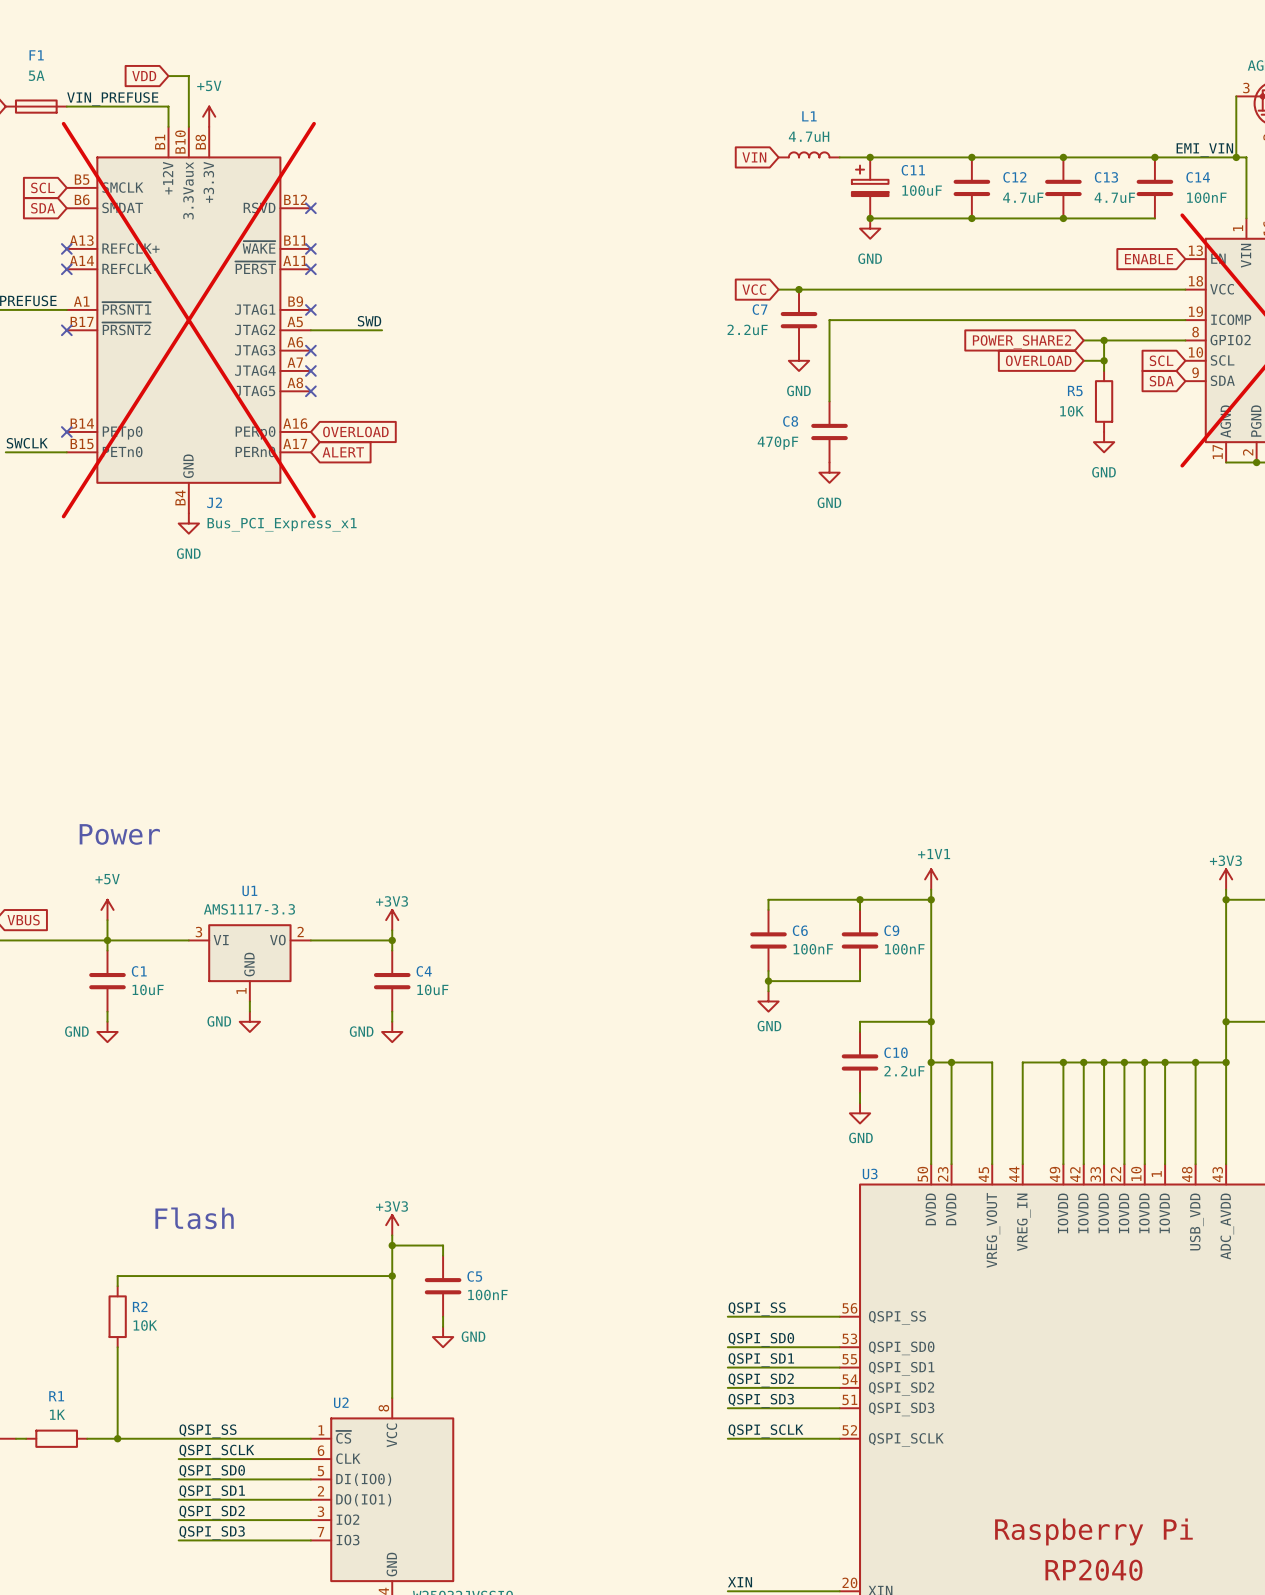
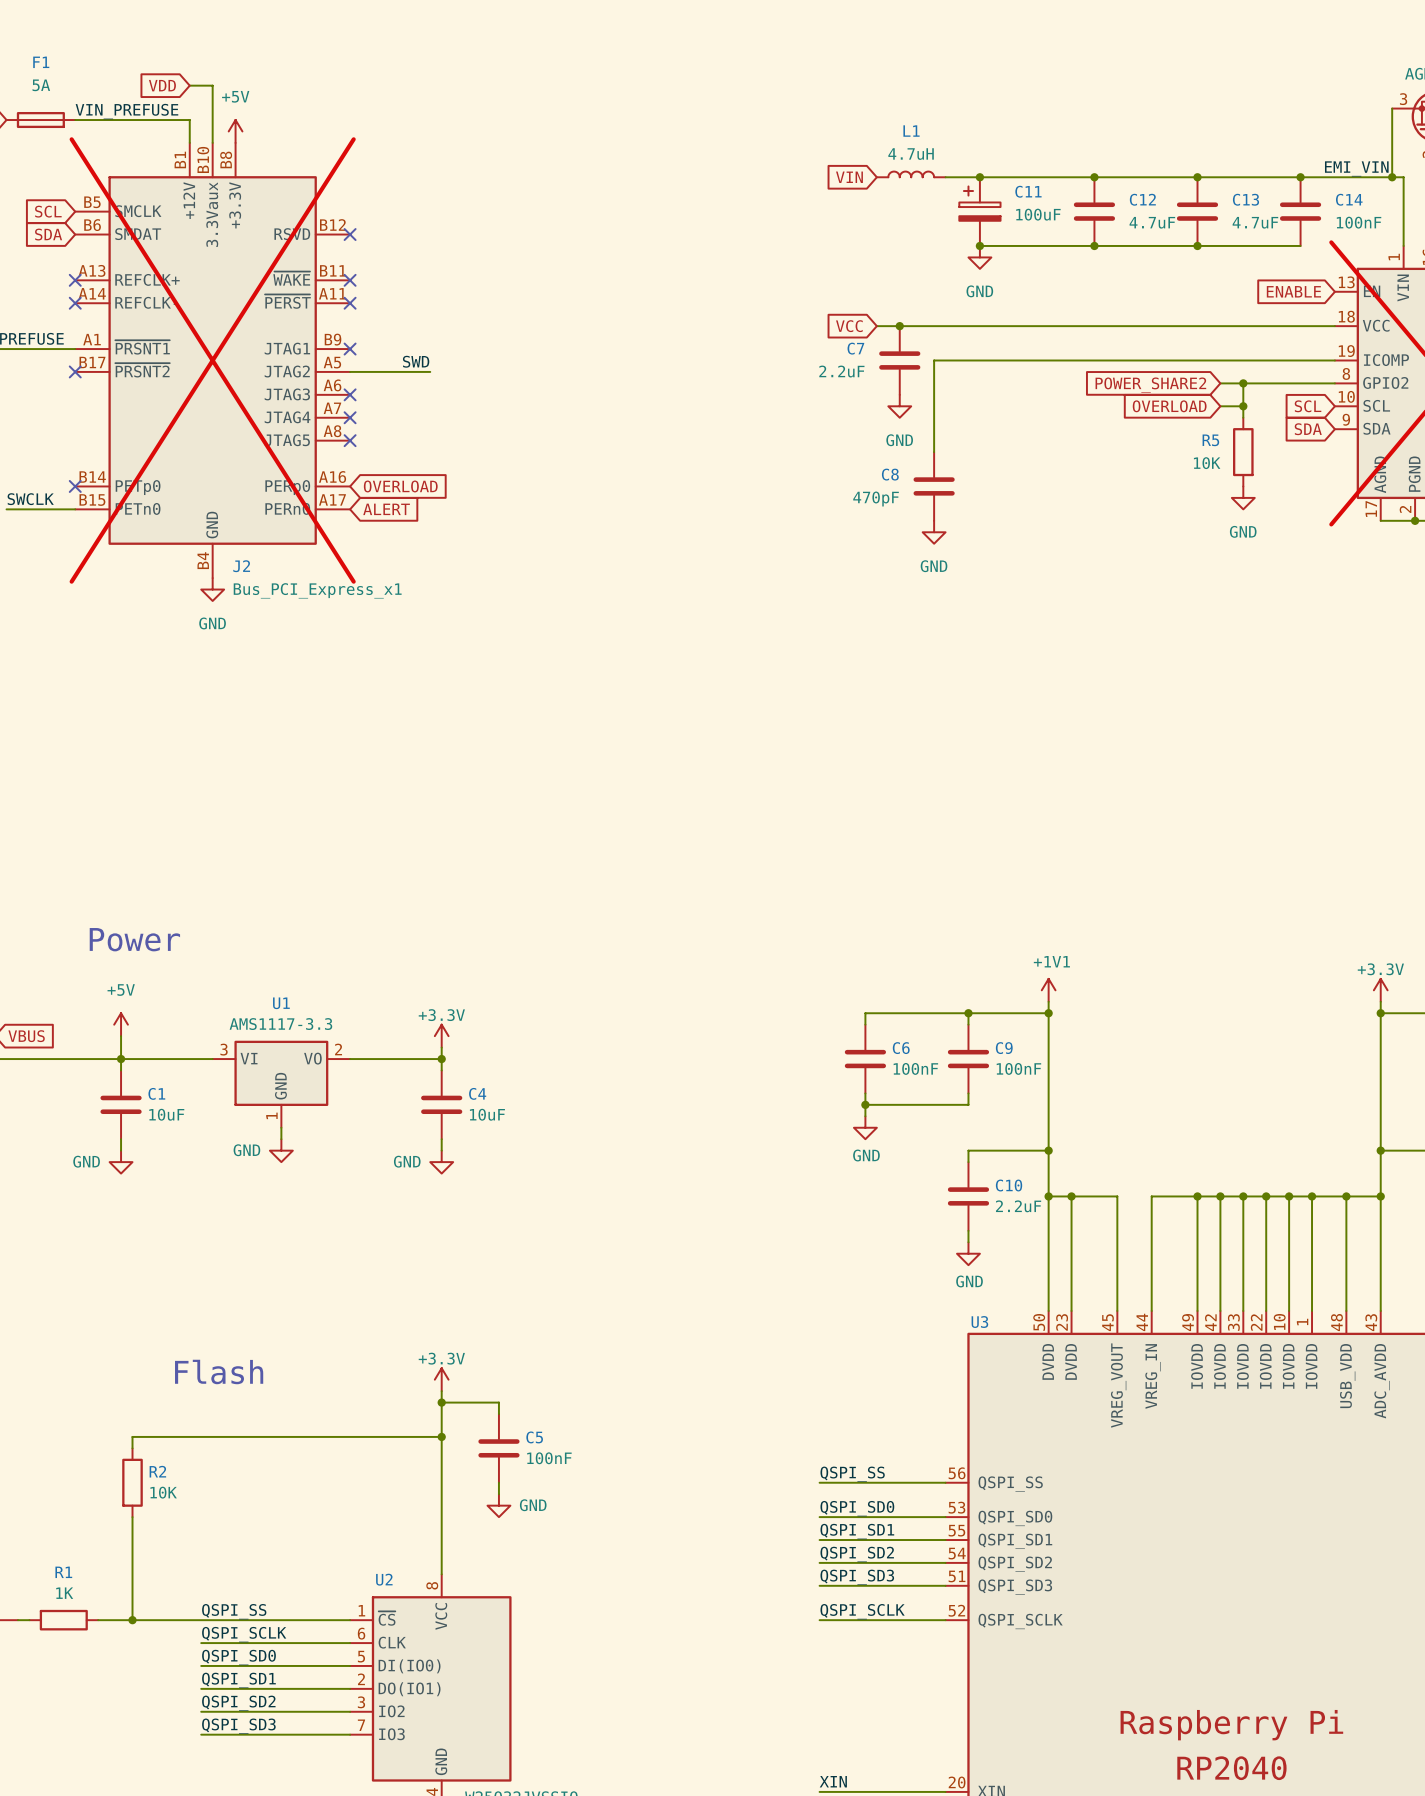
power symbol: +3V3 (1226, 879) -> +3.3V (1380, 990)
power symbol: +3V3 (392, 920) -> +3.3V (441, 1036)
power symbol: +3V3 (392, 1225) -> +3.3V (441, 1379)

